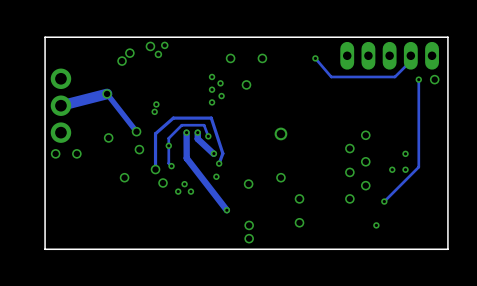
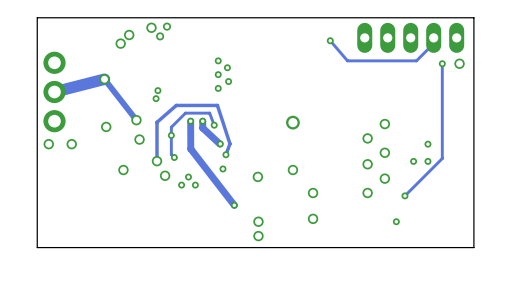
via: (230, 58) -> none
via: (262, 58) -> none
via: (246, 84) -> none

